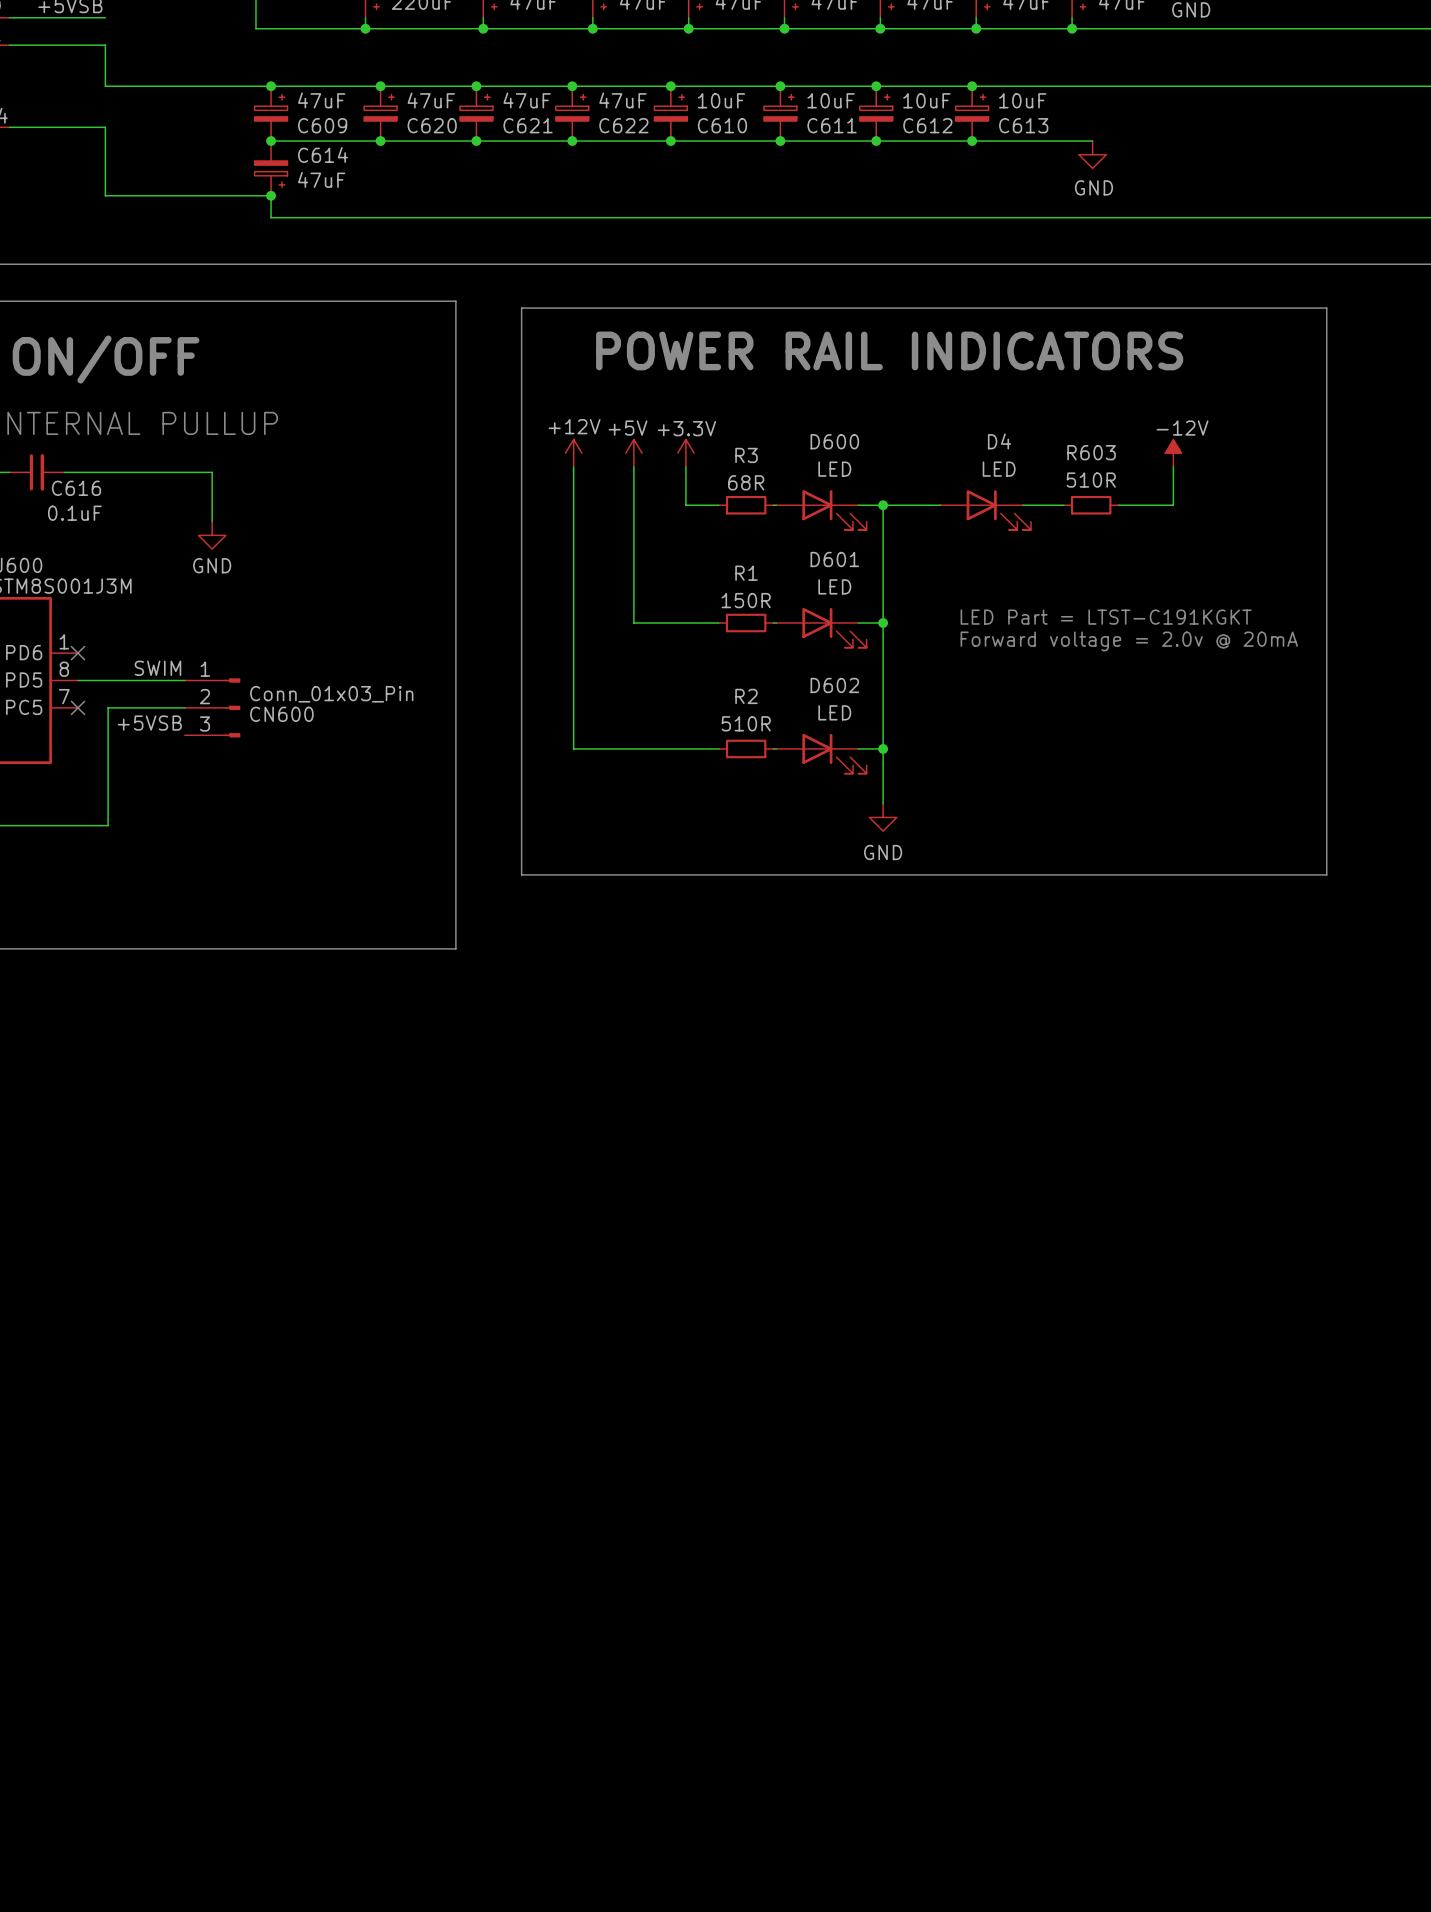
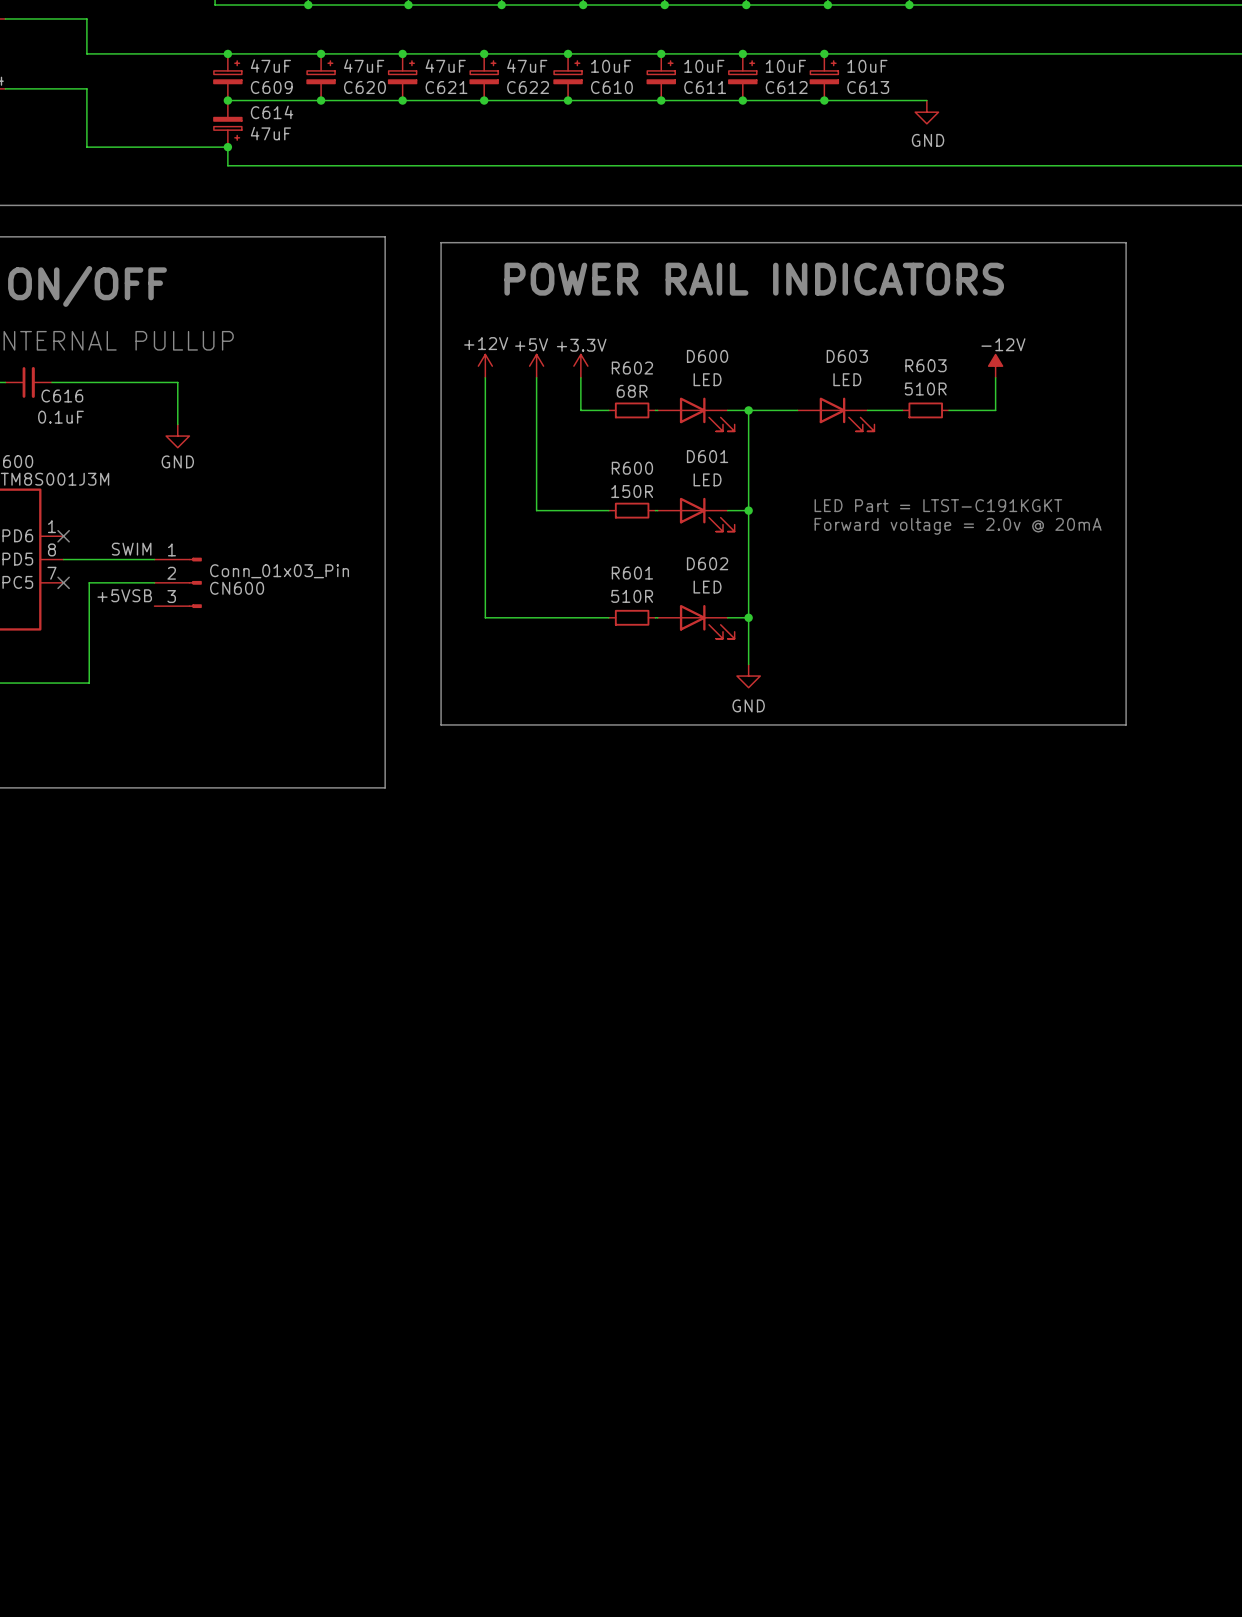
D4 name: D4 (999, 441) -> D603 (847, 356)
R3 name: R3 (746, 455) -> R602 (632, 368)
R1 name: R1 (746, 573) -> R600 (632, 468)
R2 name: R2 (746, 696) -> R601 (632, 573)

